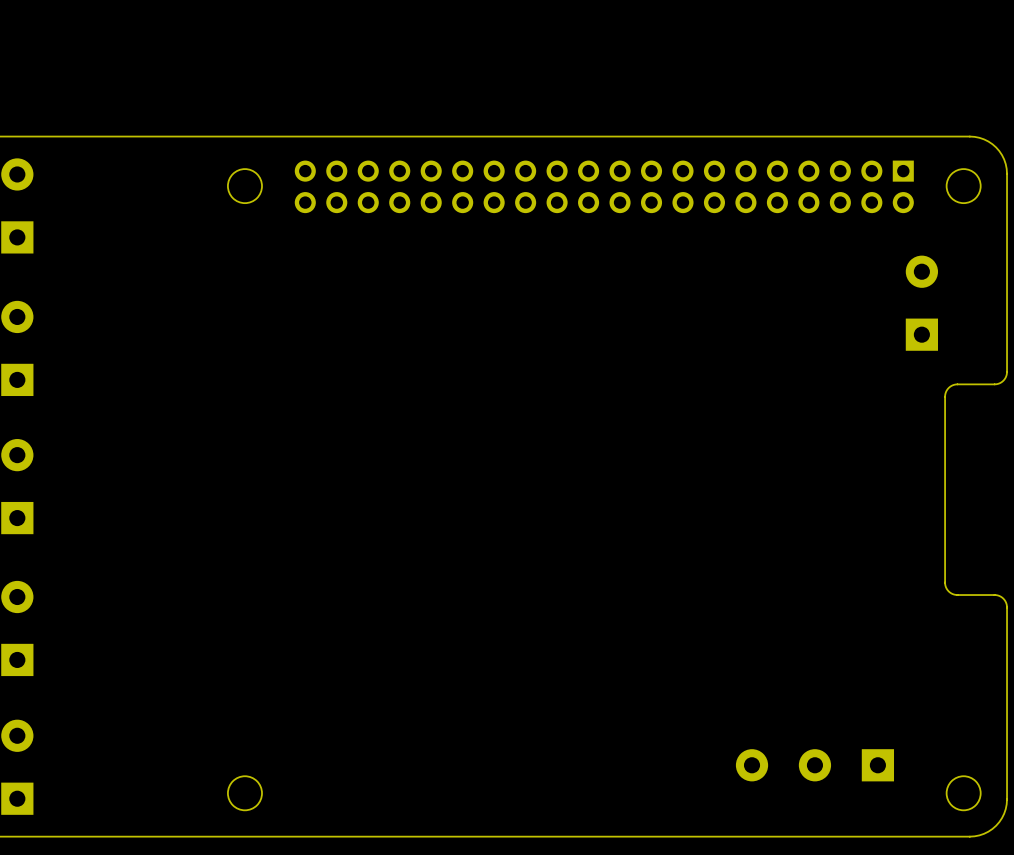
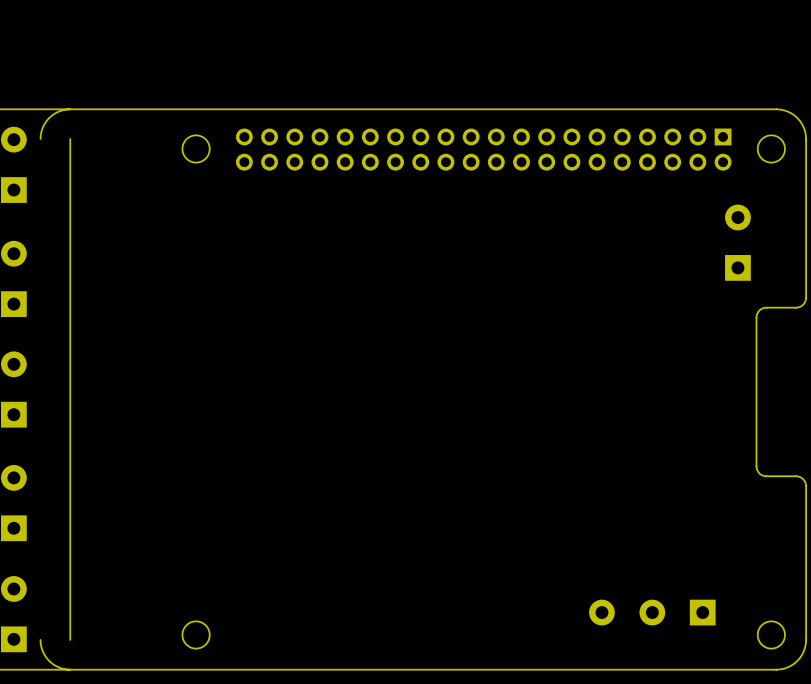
board edge: none -> (70, 109) (58, 111) (49, 118) (42, 127) (40, 139)
board edge: none -> (70, 139) (70, 639)
board edge: none -> (40, 639) (42, 651) (49, 660) (58, 667) (70, 669)

